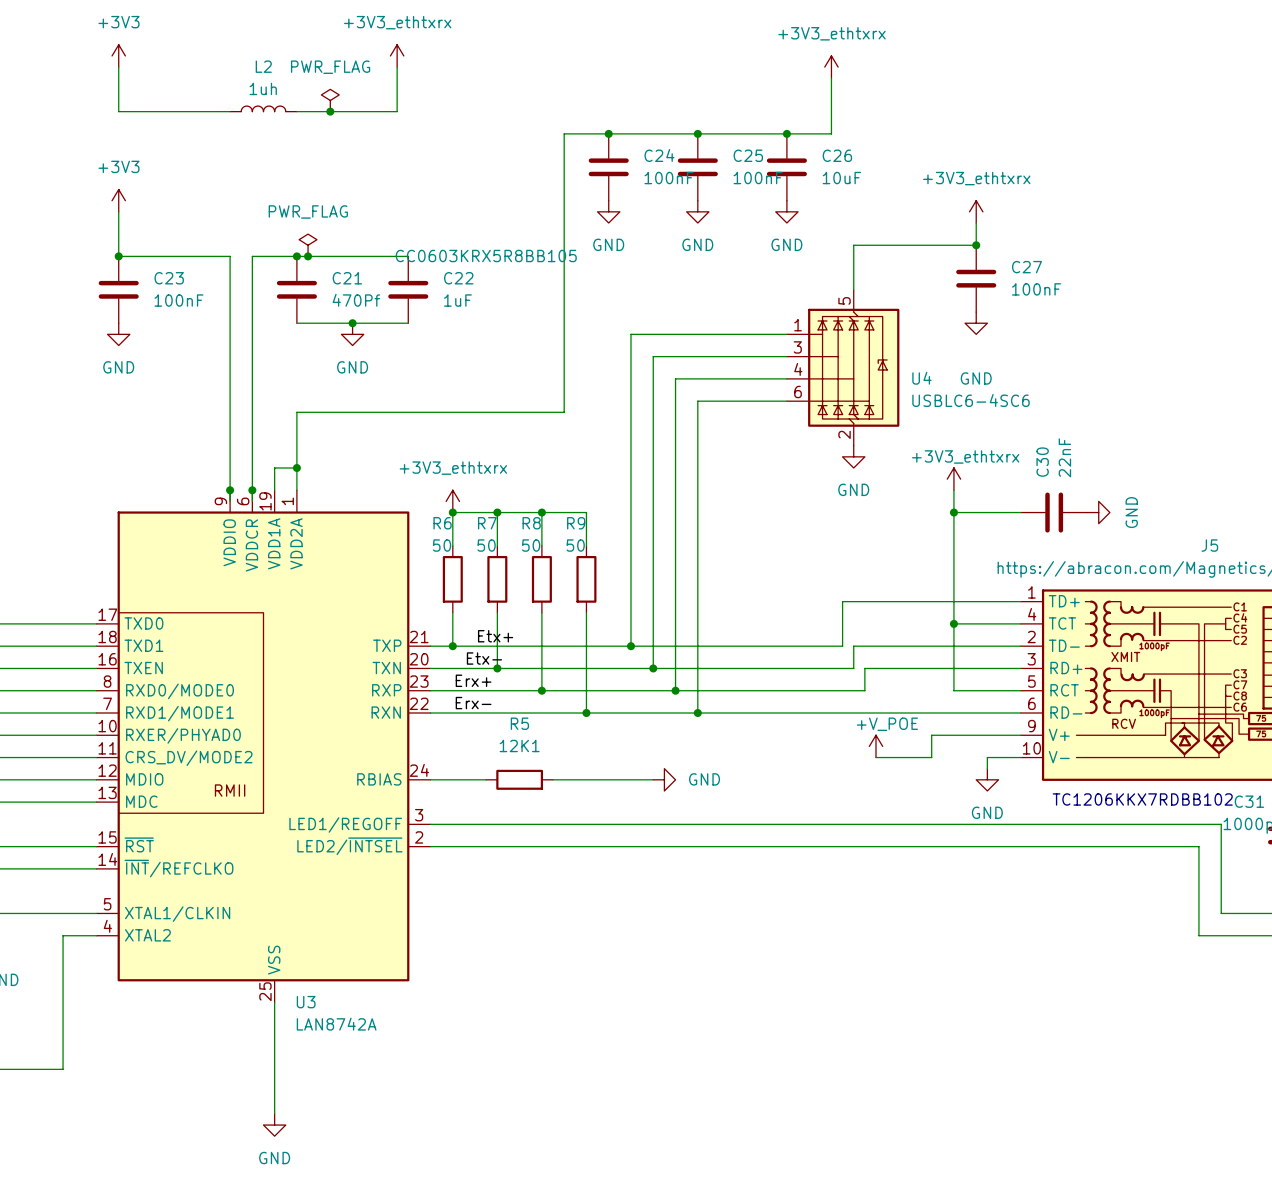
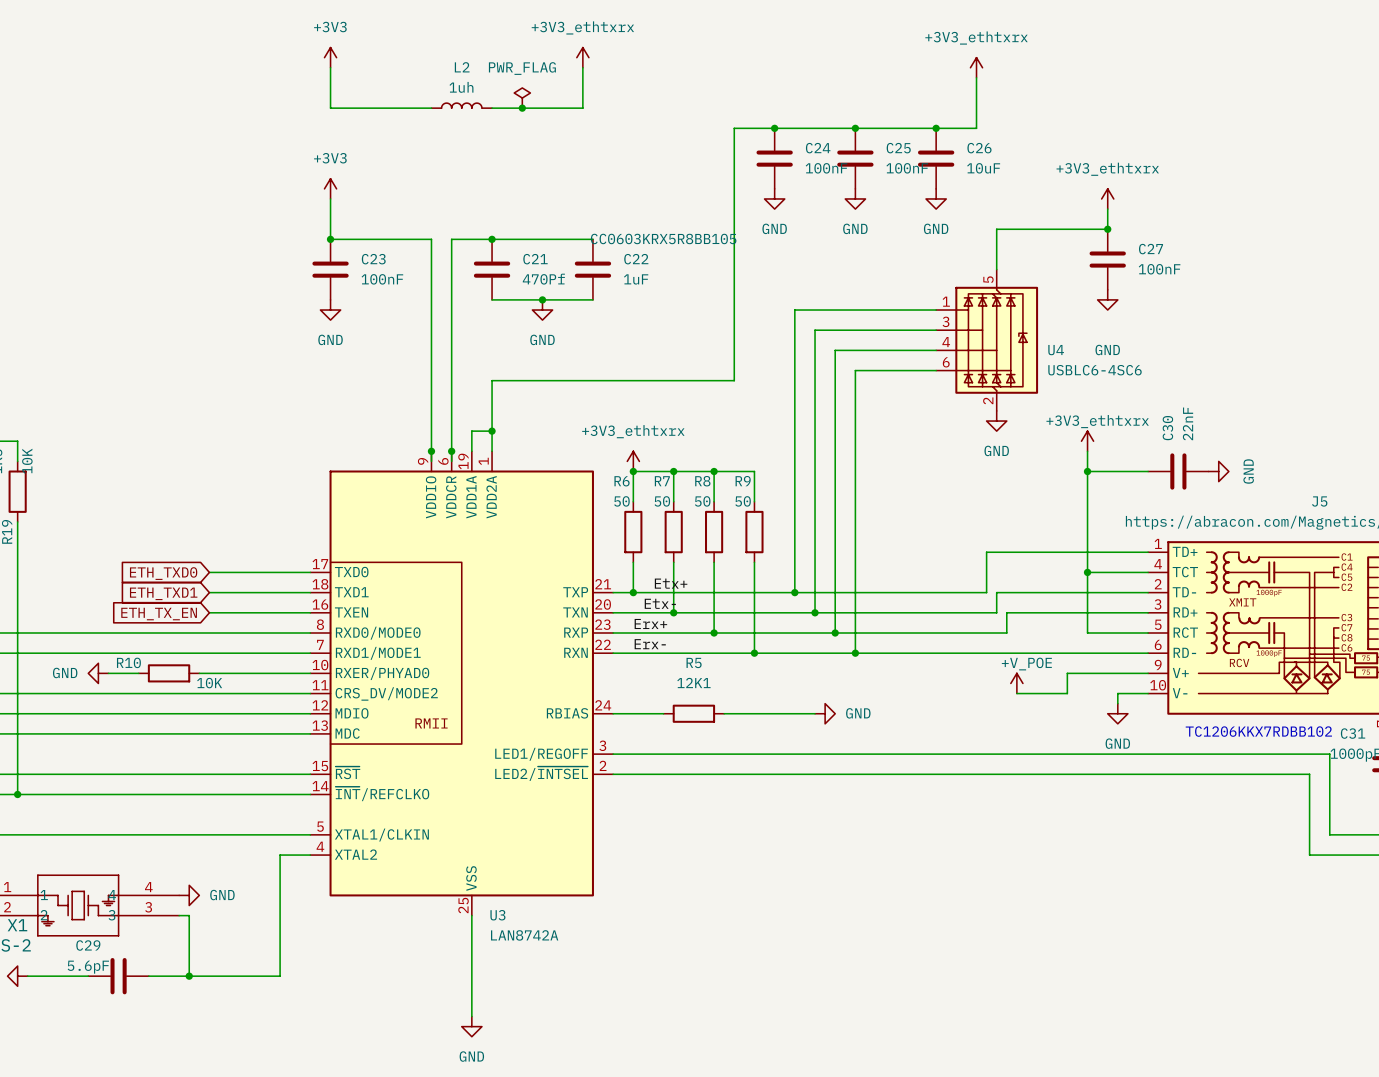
power symbol: PWR_FLAG (308, 245) -> none
junction: (308, 256) -> none

